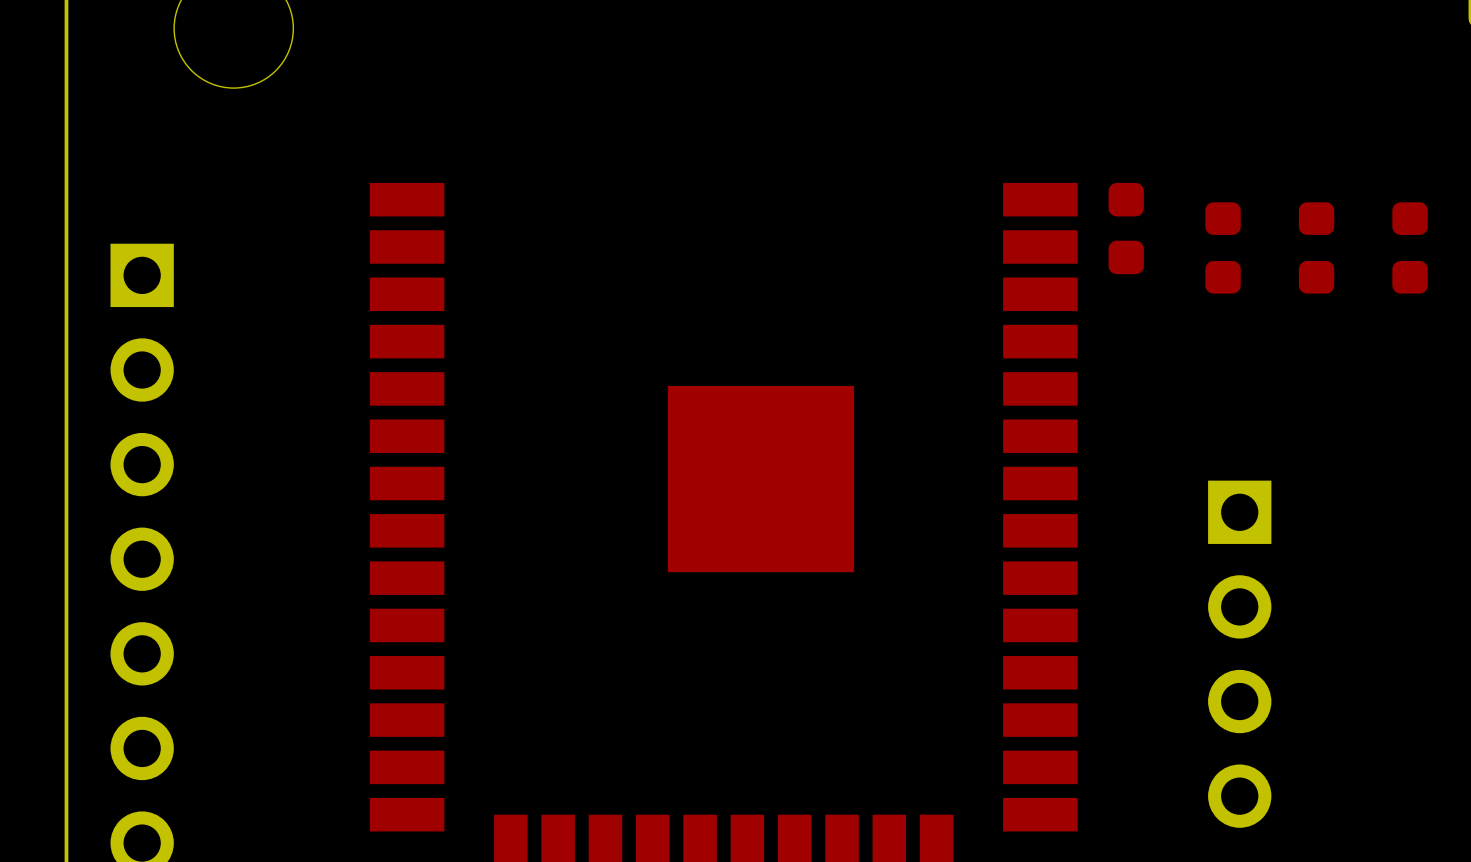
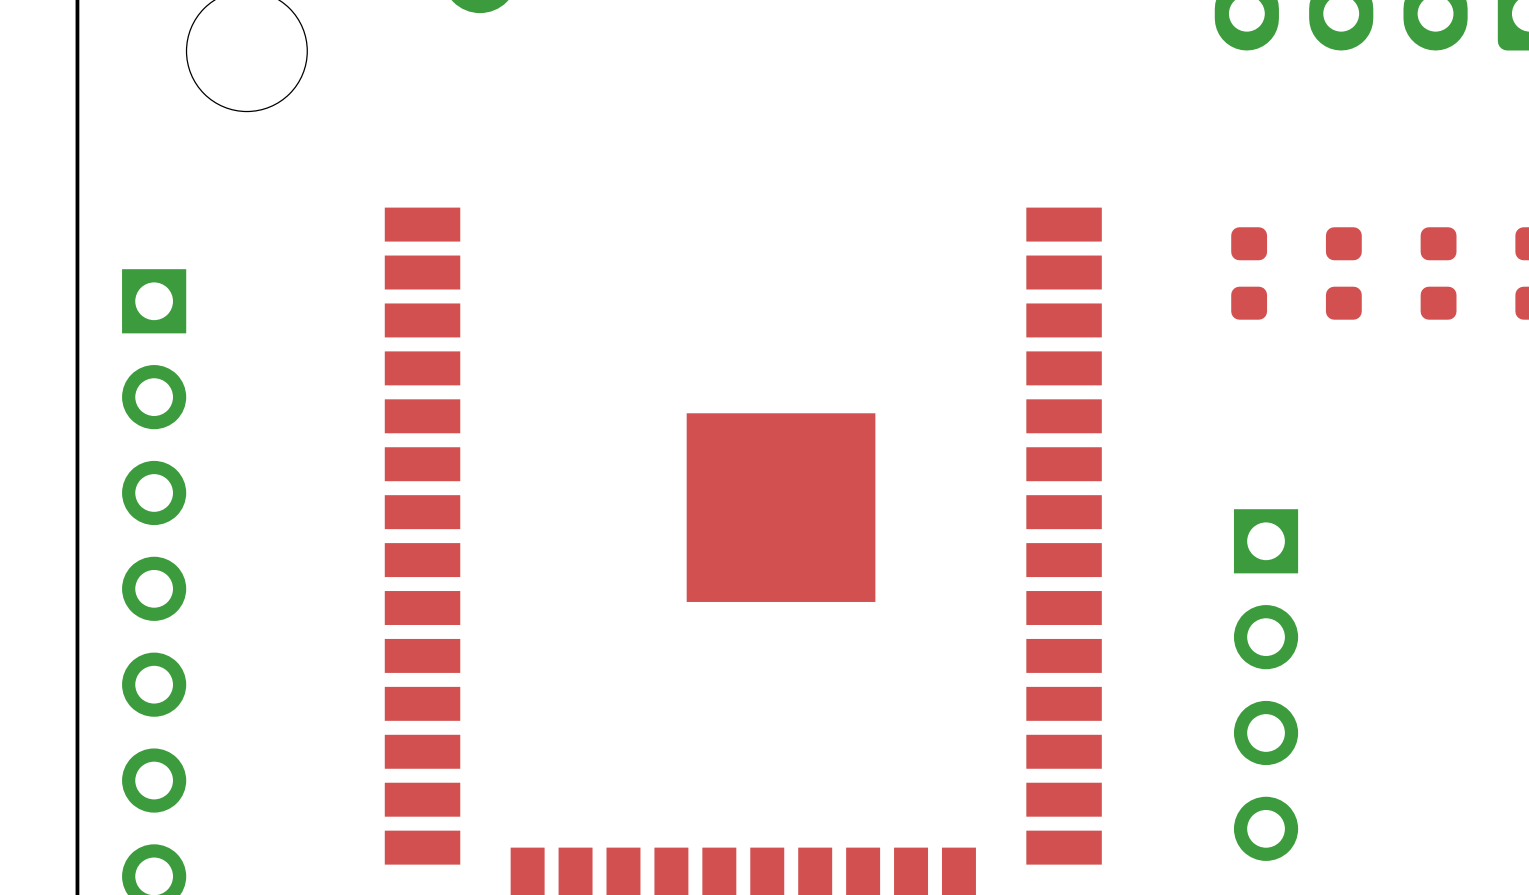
part: (1126, 228) -> none

